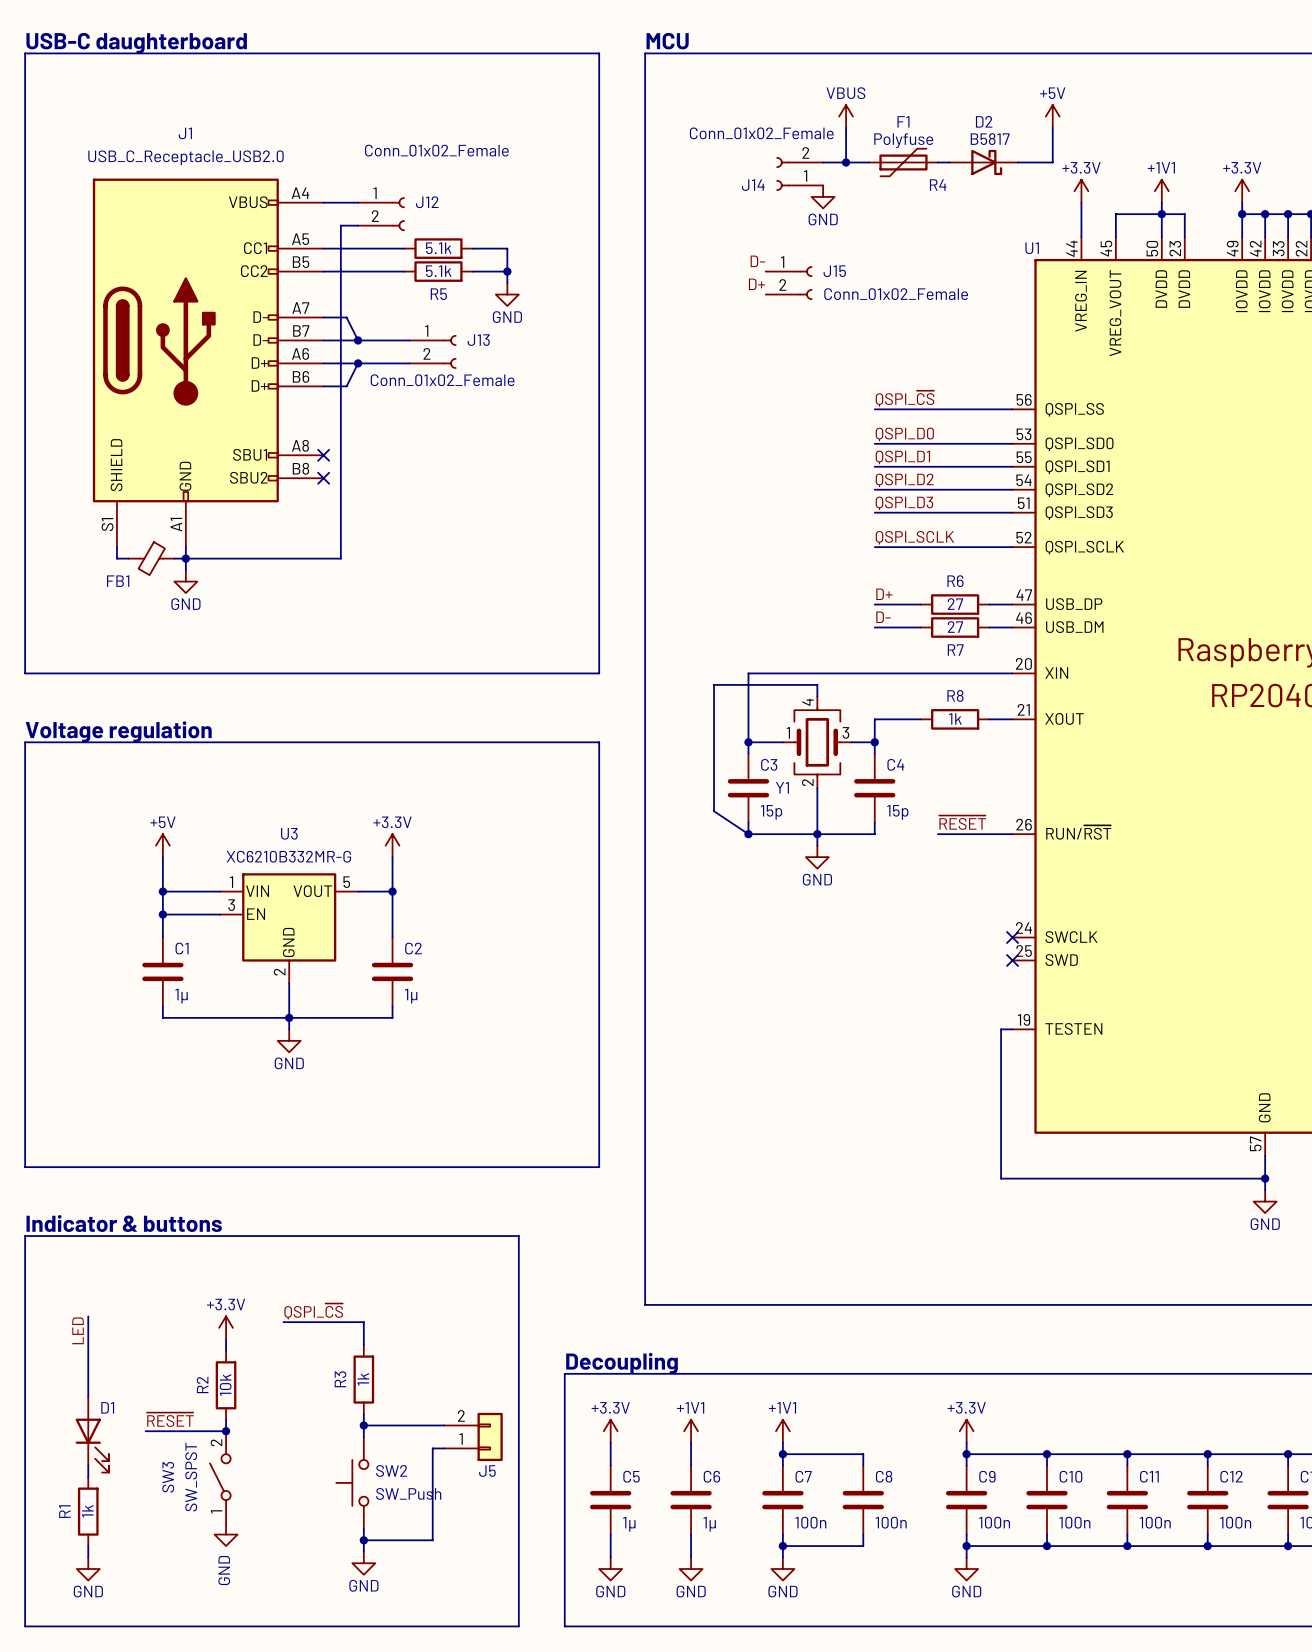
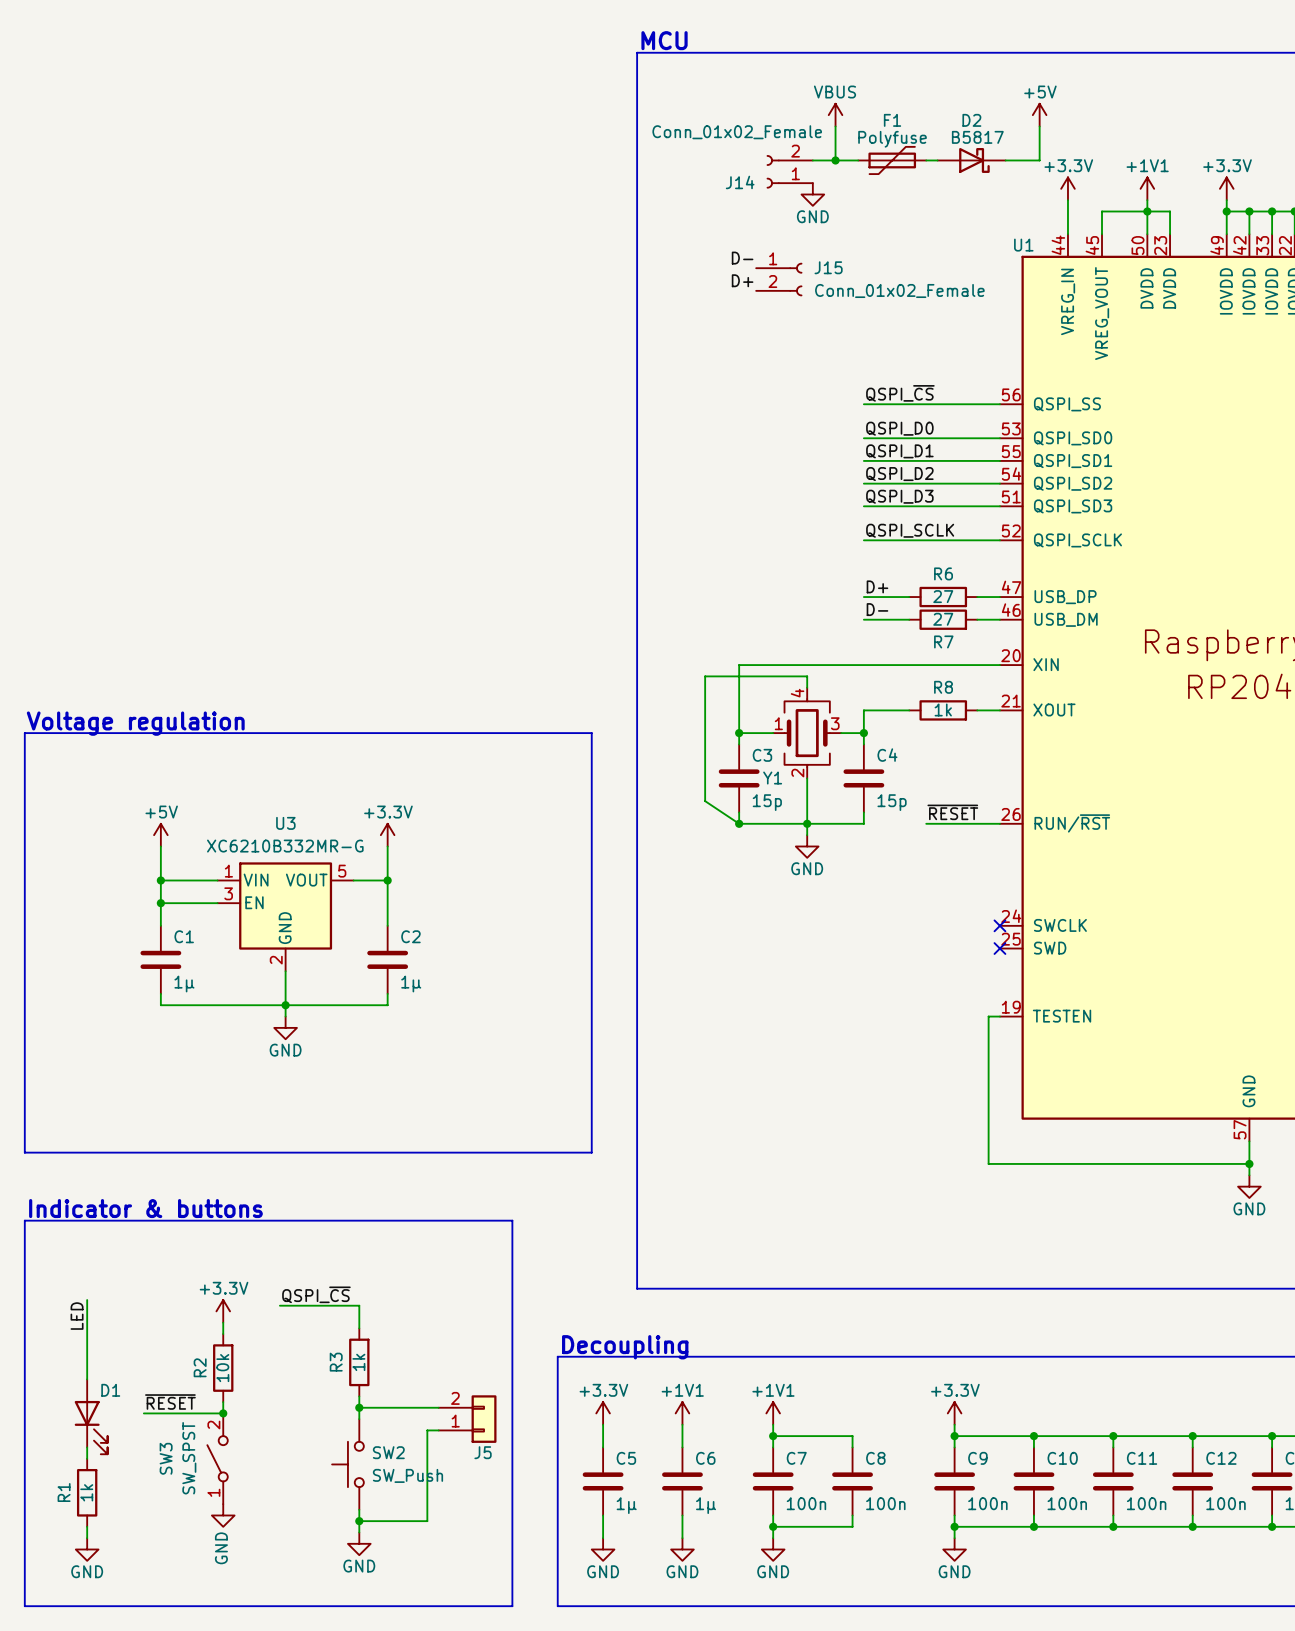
text: USB-C daughterboard (136, 43) -> none
line: (25, 53) (599, 53) (599, 673) (25, 673) (25, 53) -> none
wire: (323, 202) (358, 202) -> none
J12: Conn_01x02_Female (381, 214) -> none
wire: (358, 225) (340, 225) (340, 558) (174, 558) -> none
wire: (323, 248) (404, 248) -> none
R4: 5.1k (438, 248) -> none
wire: (472, 248) (507, 248) (507, 283) -> none
wire: (323, 271) (404, 271) -> none
R5: 5.1k (438, 271) -> none
wire: (472, 271) (507, 271) -> none
junction: (507, 271) -> none
power symbol: GND (507, 294) -> none
wire: (323, 317) (346, 317) (358, 340) -> none
wire: (323, 340) (409, 340) -> none
junction: (358, 340) -> none
J13: Conn_01x02_Female (433, 351) -> none
J1: USB_C_Receptacle_USB2.0 (208, 362) -> none
wire: (323, 363) (409, 363) -> none
wire: (358, 363) (346, 386) (323, 386) -> none
junction: (358, 363) -> none
no-connect mark: (323, 455) -> none
no-connect mark: (323, 478) -> none
wire: (116, 547) (116, 558) (128, 558) -> none
wire: (185, 547) (185, 570) -> none
FB1: (151, 558) -> none
junction: (185, 558) -> none
power symbol: GND (185, 581) -> none

